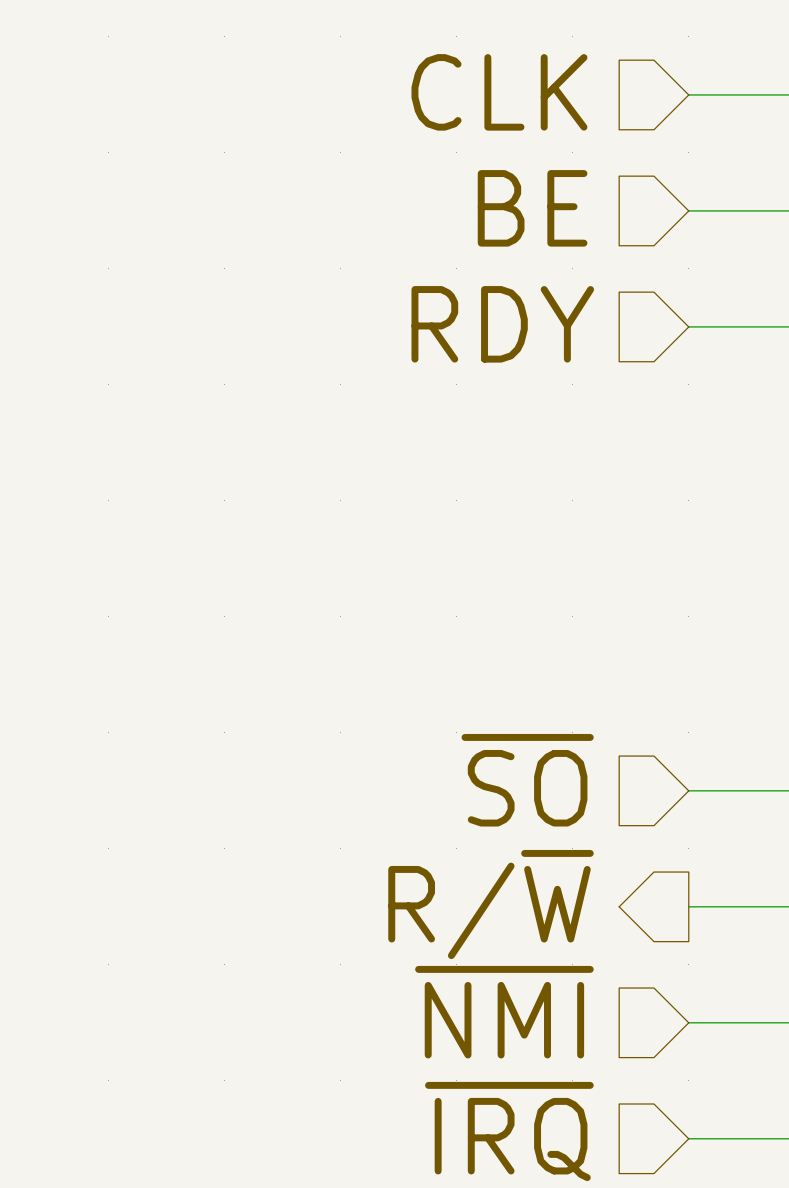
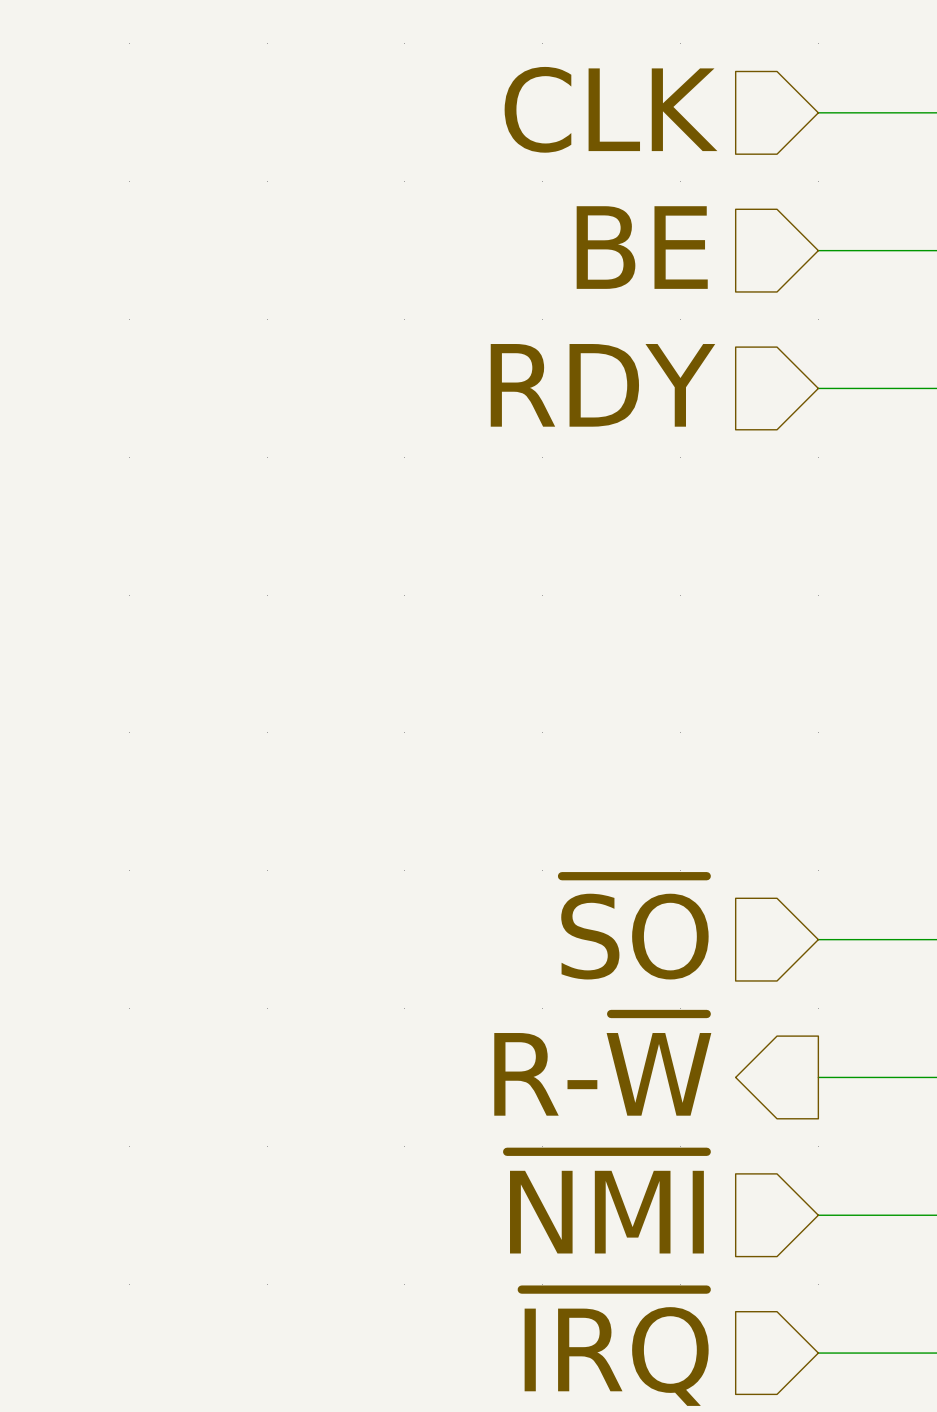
hierarchical label: R/~{W} (491, 904) -> R-~{W} (602, 1064)

